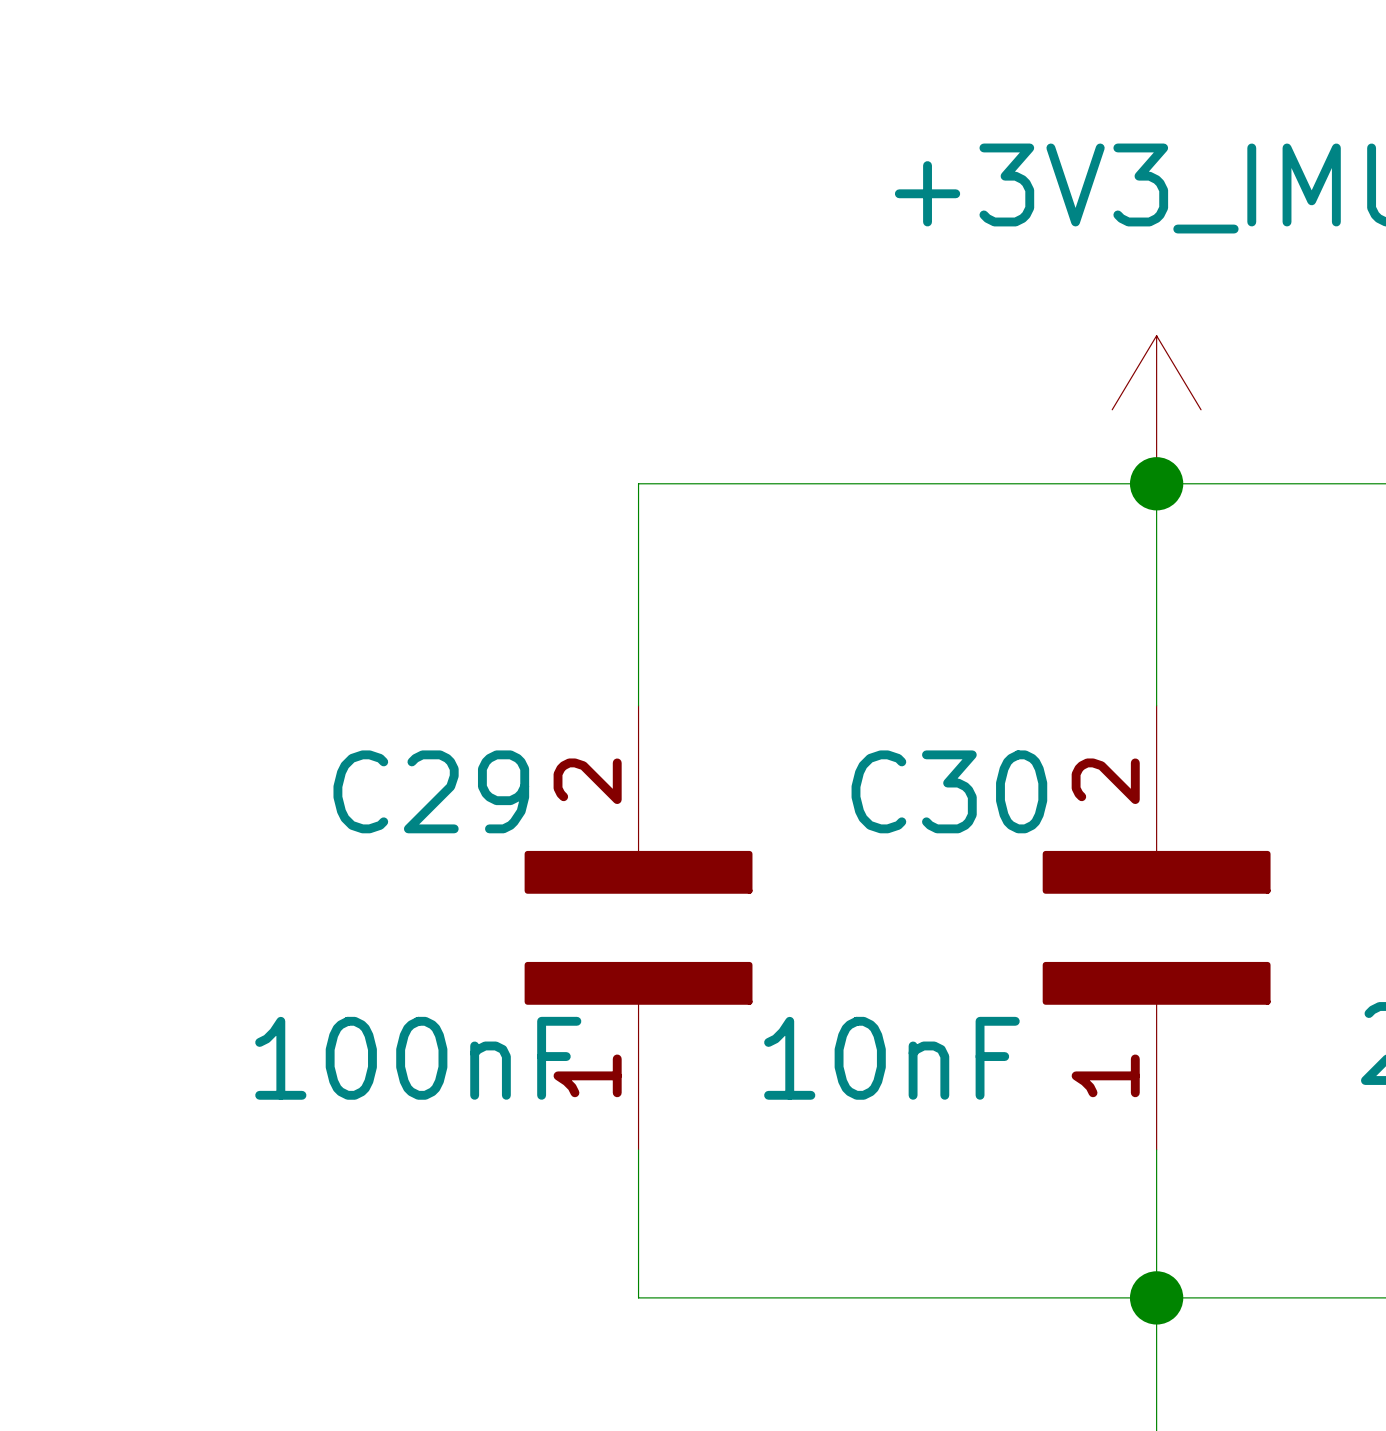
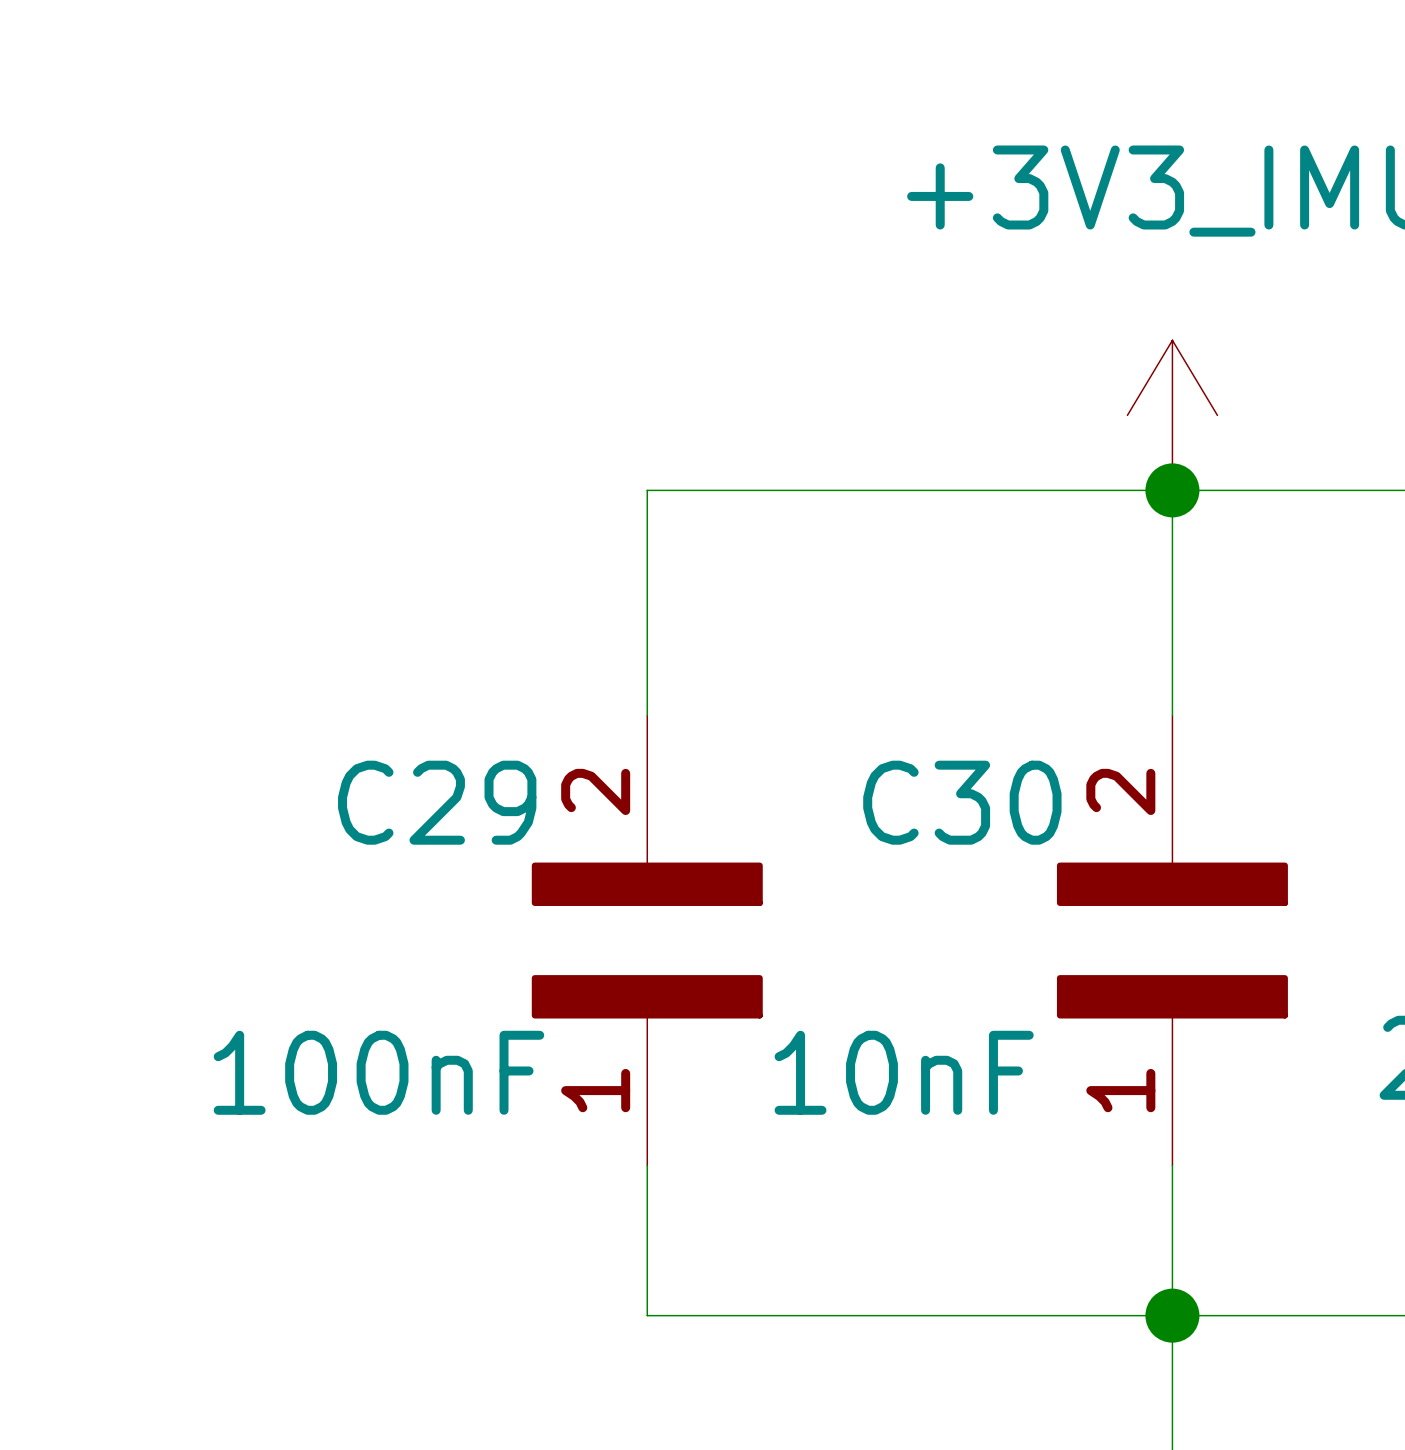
C29 value position: 100nF (418, 1058) -> 100nF (378, 1072)

